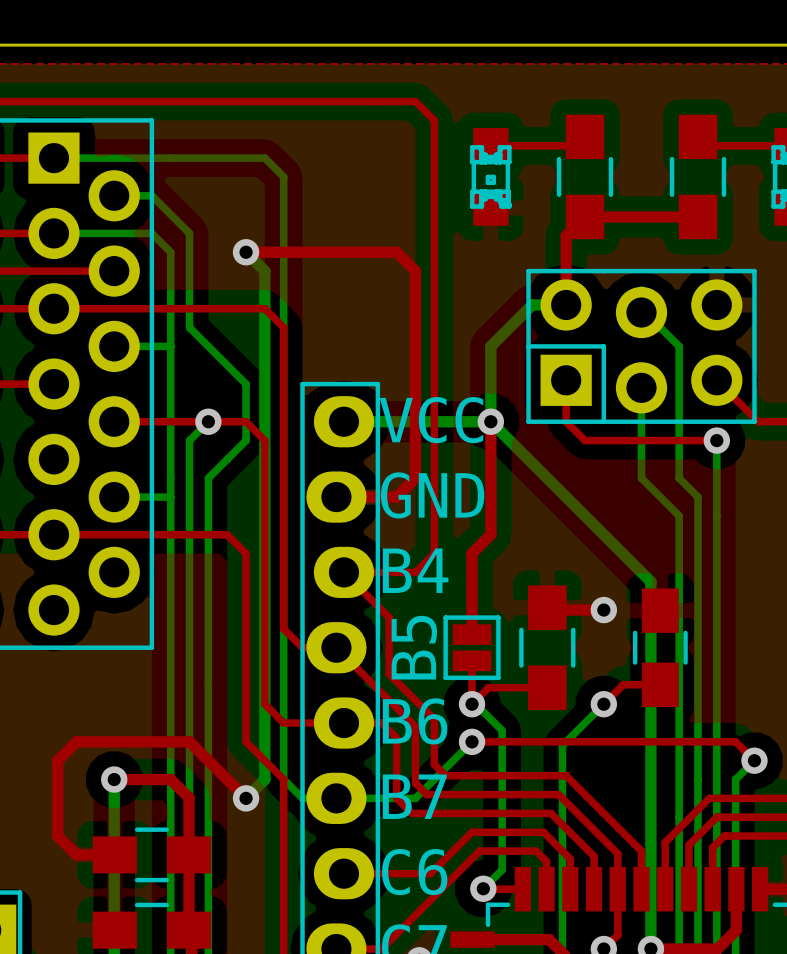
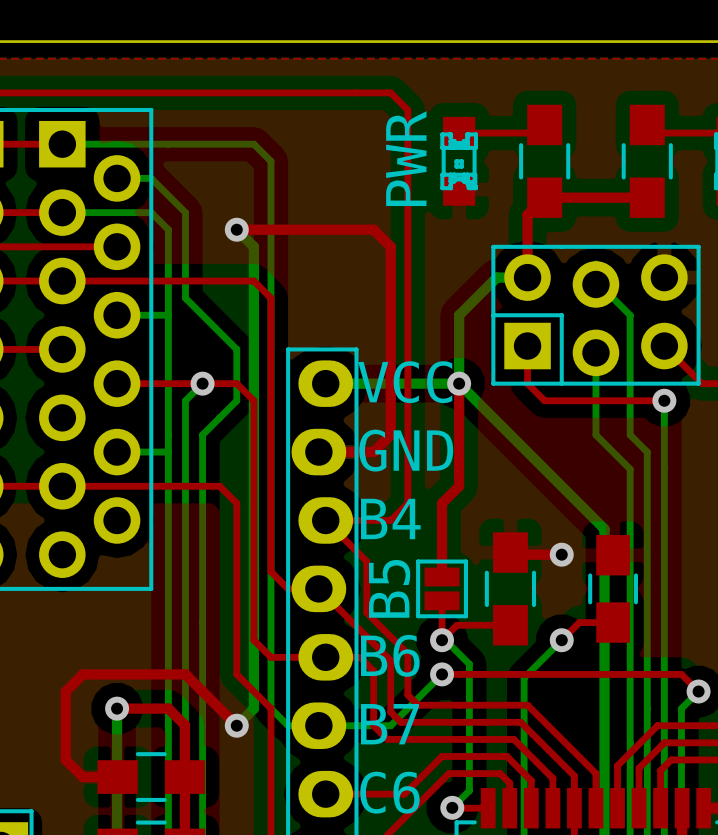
text: none -> PWR (406, 158)

